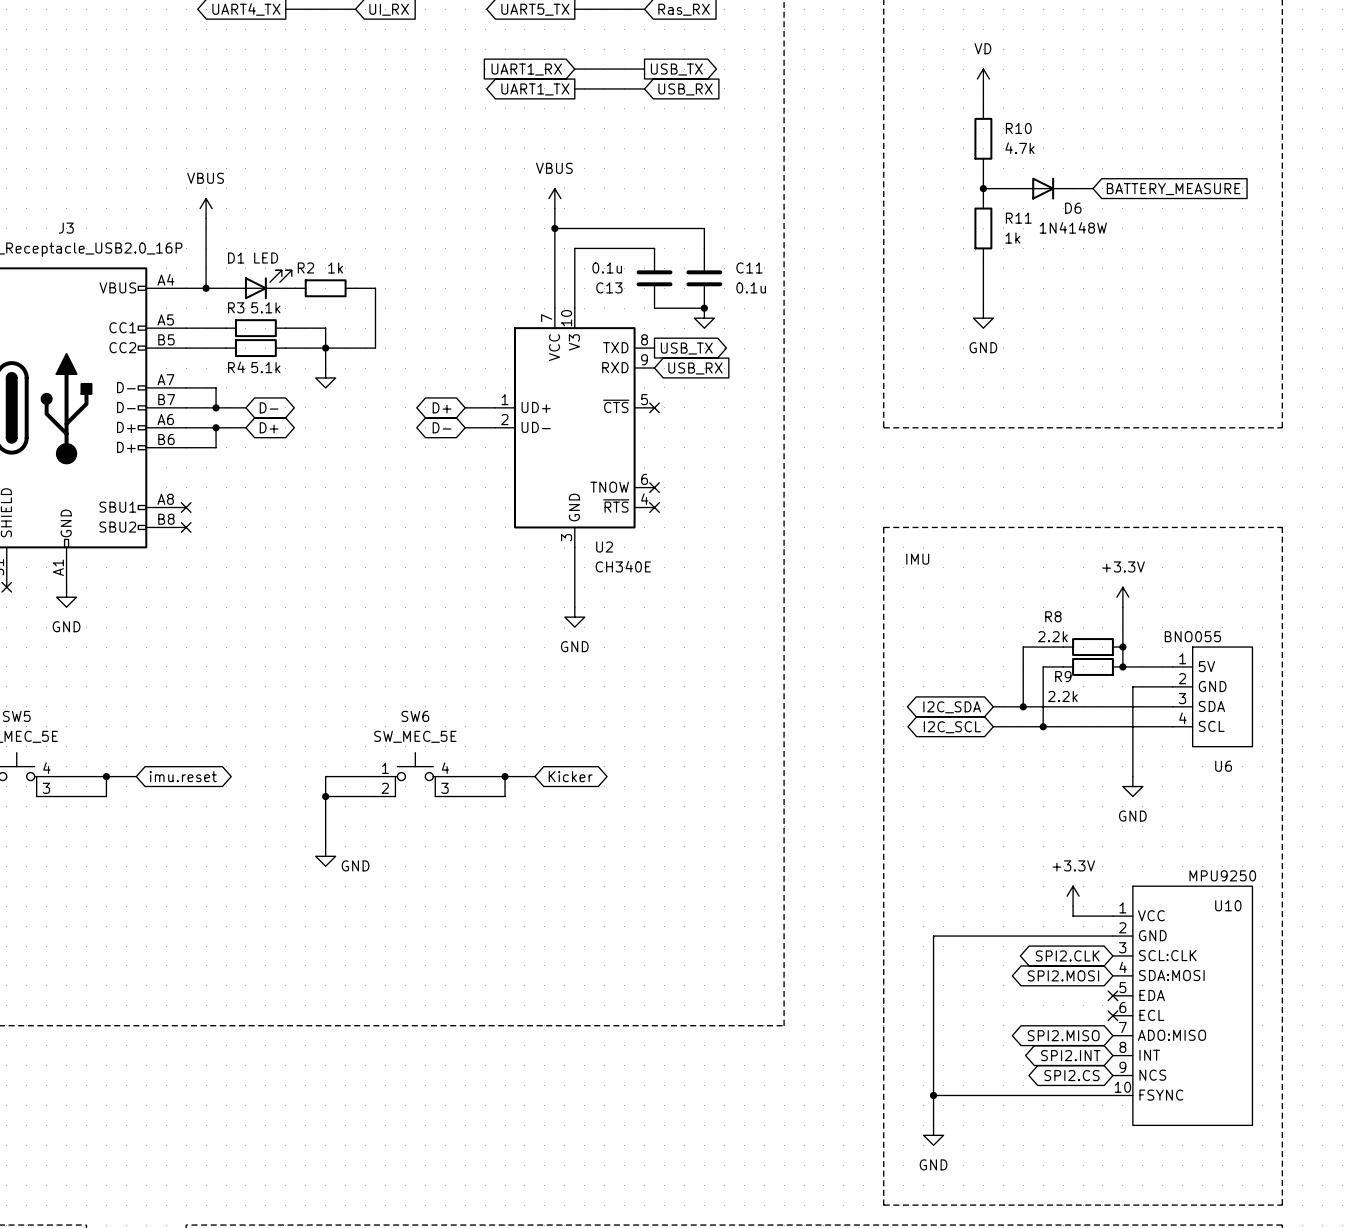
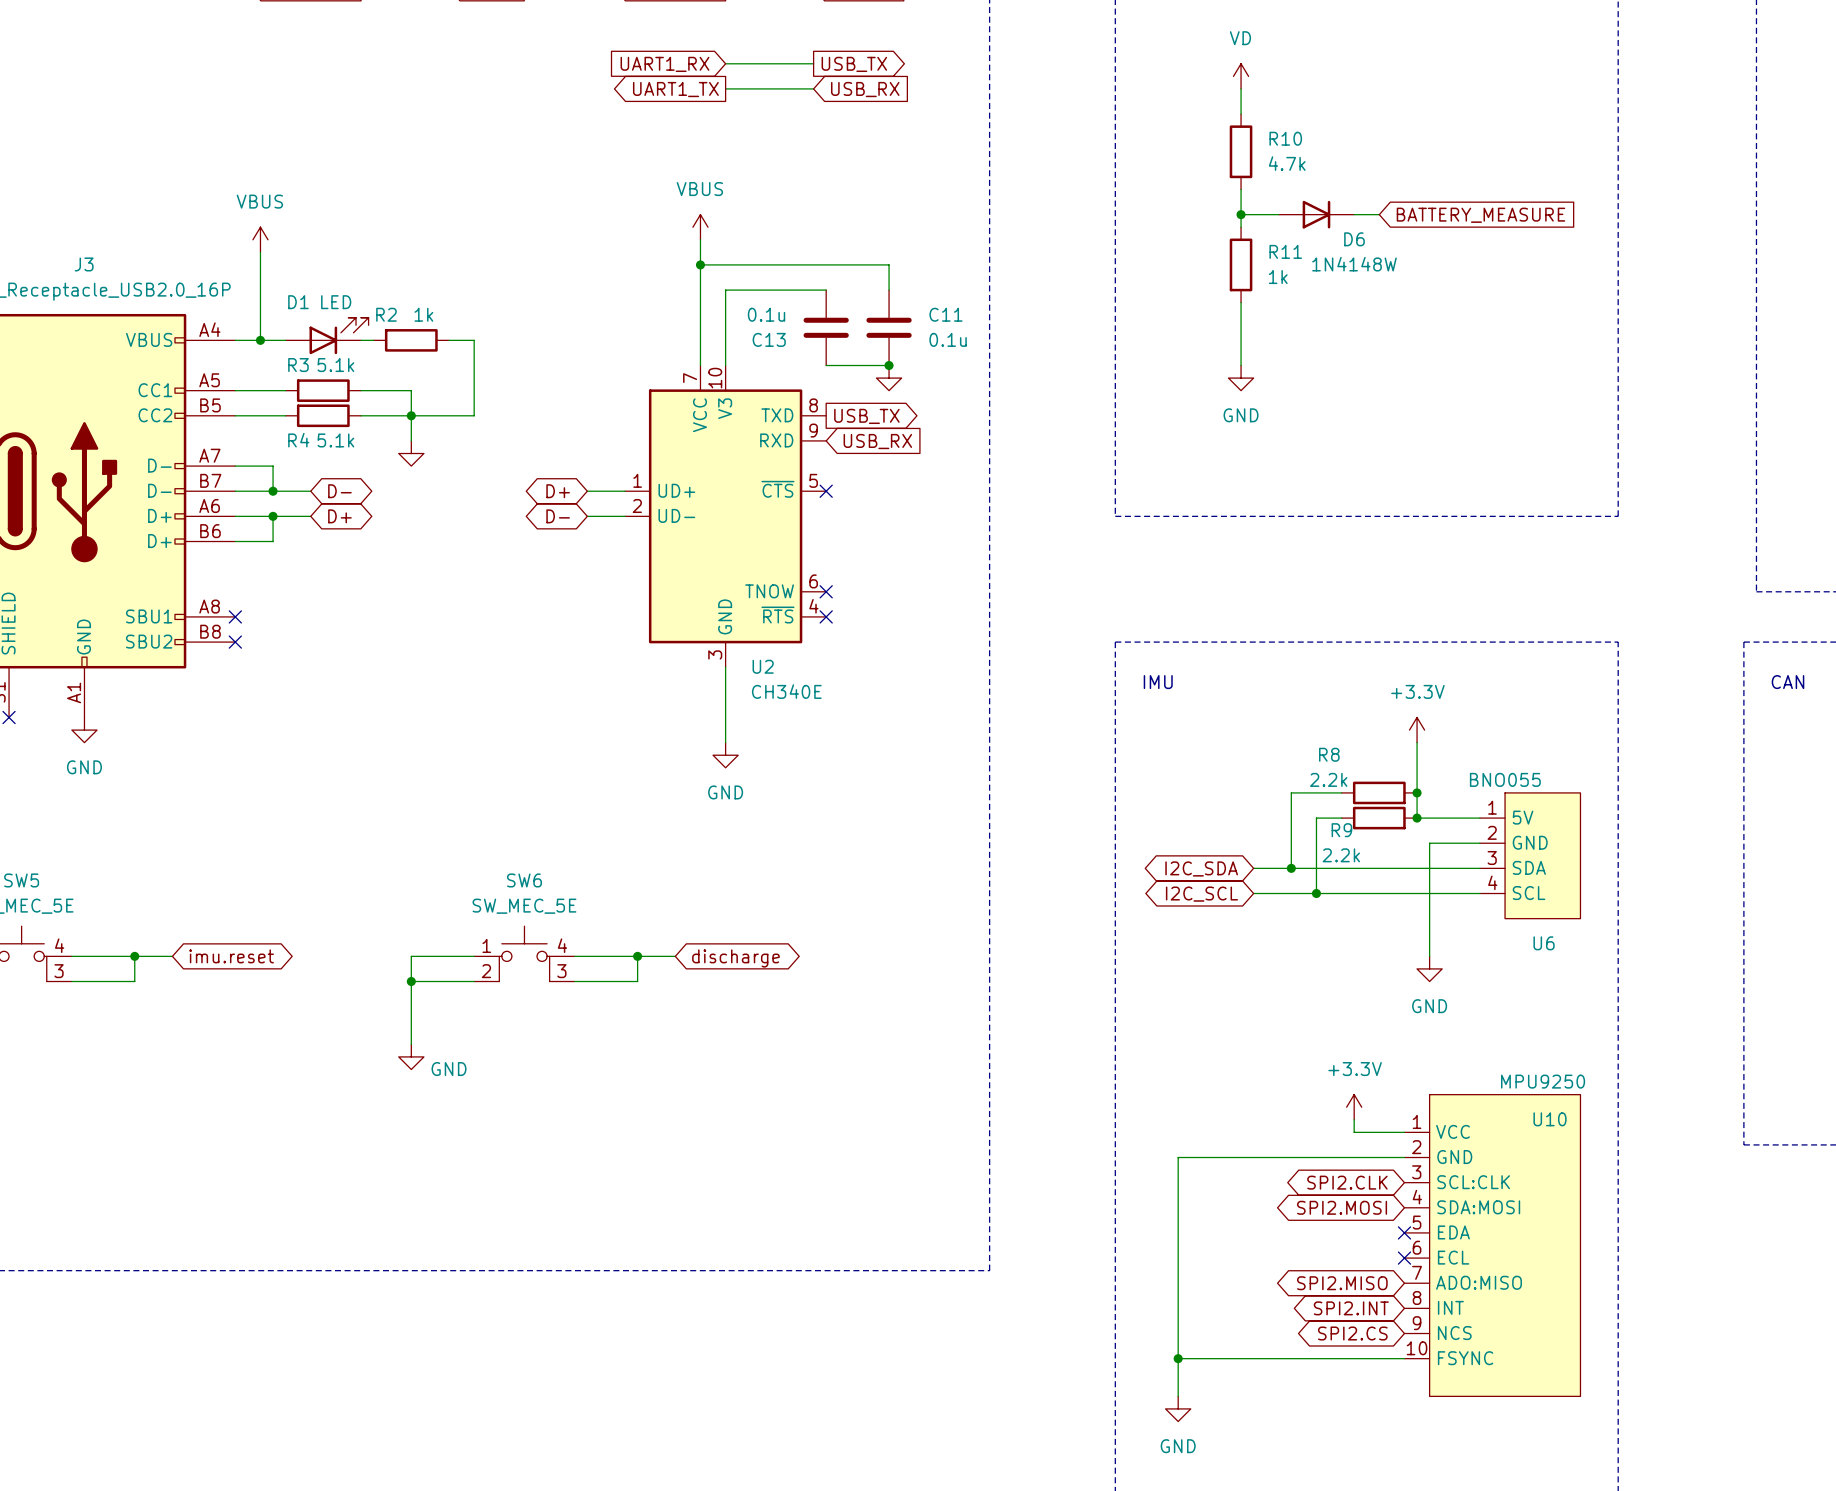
global label: Kicker (570, 776) -> discharge (735, 958)

